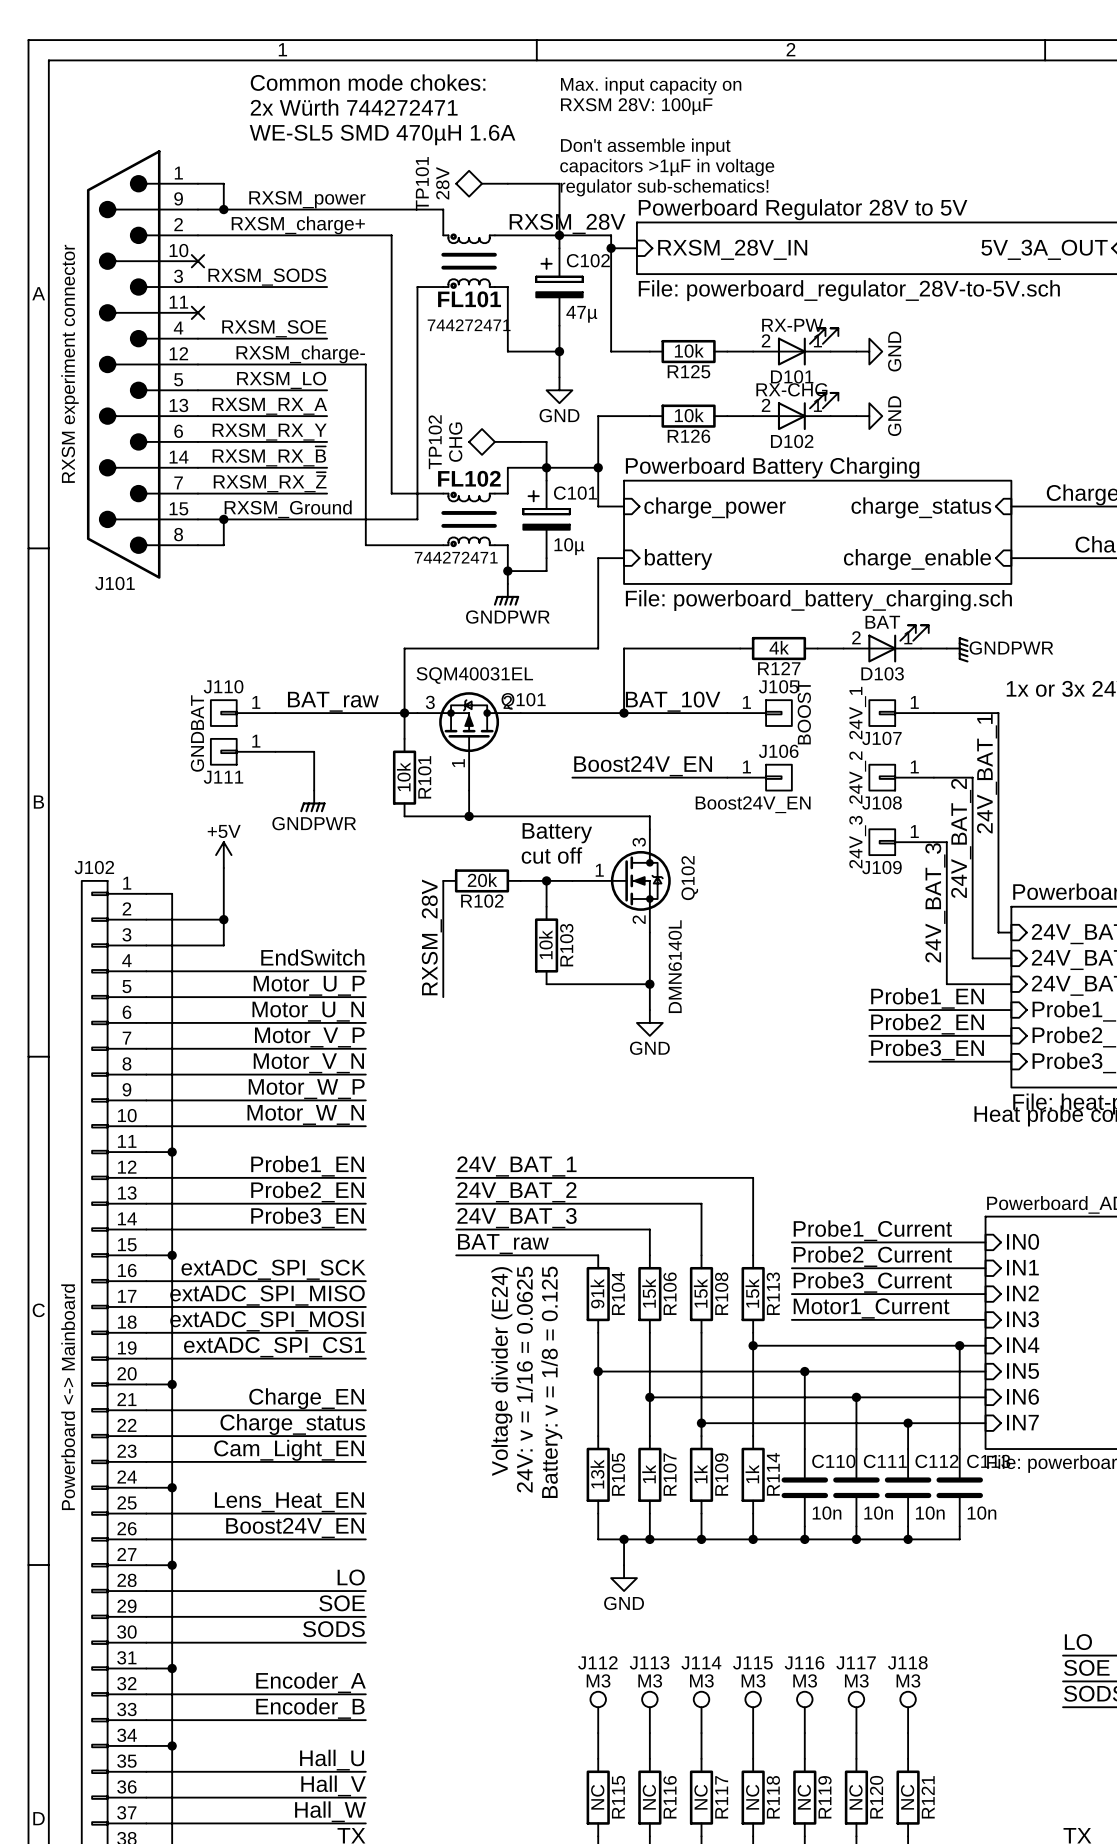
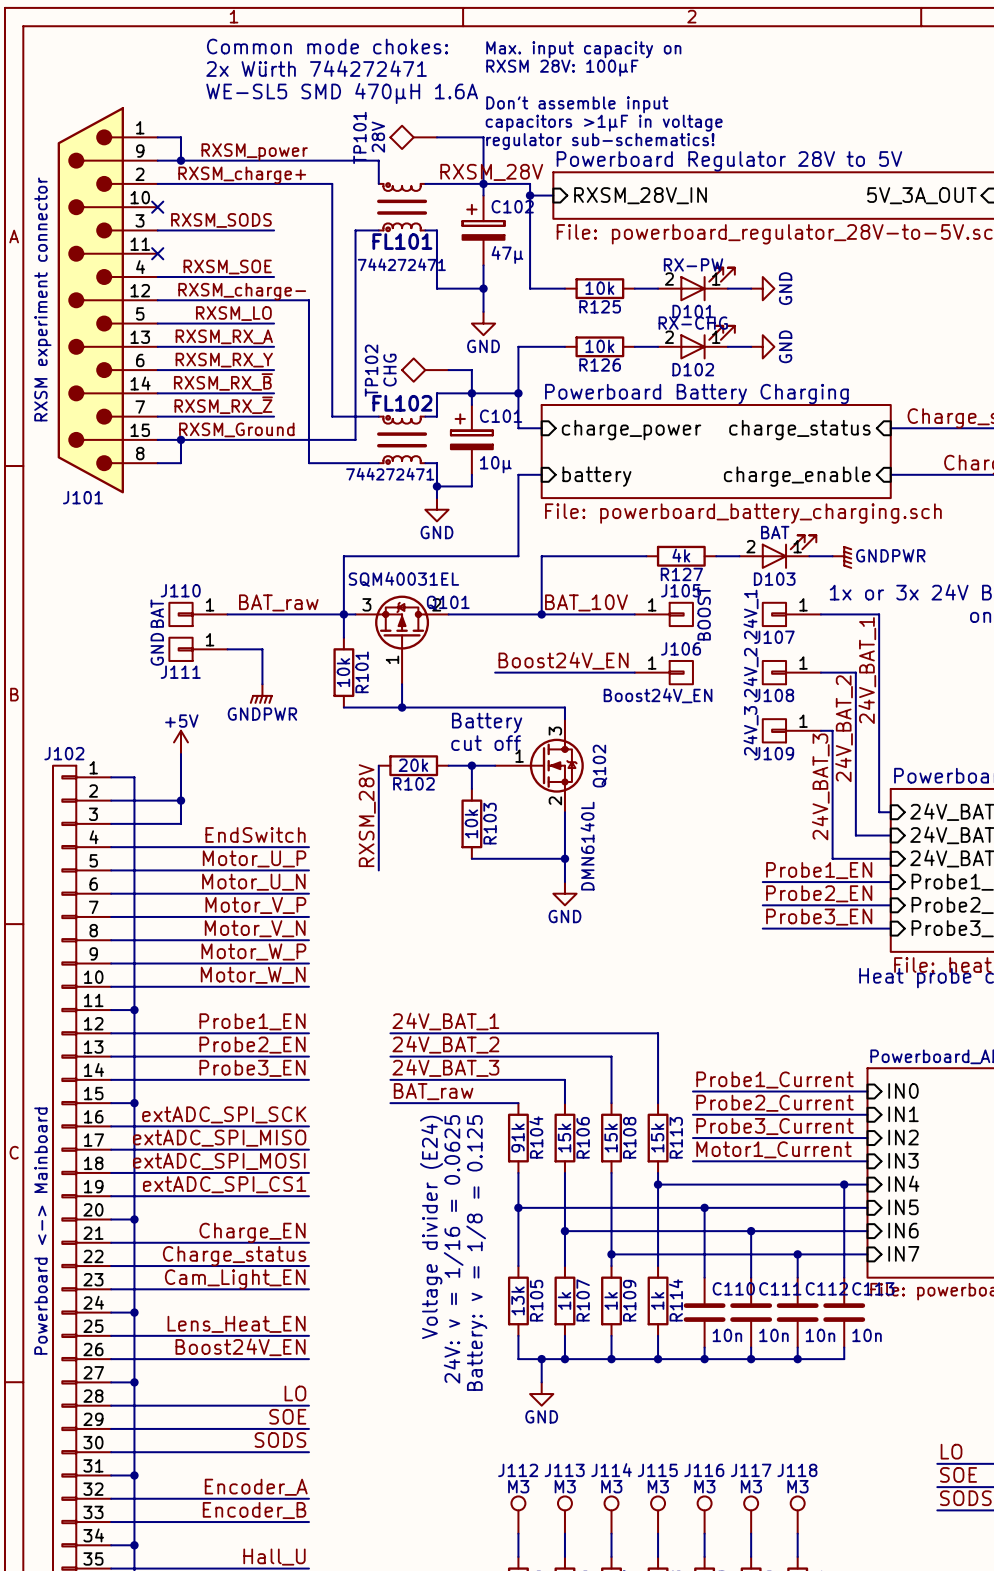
power symbol: GNDPWR (506, 594) -> GND (436, 509)

